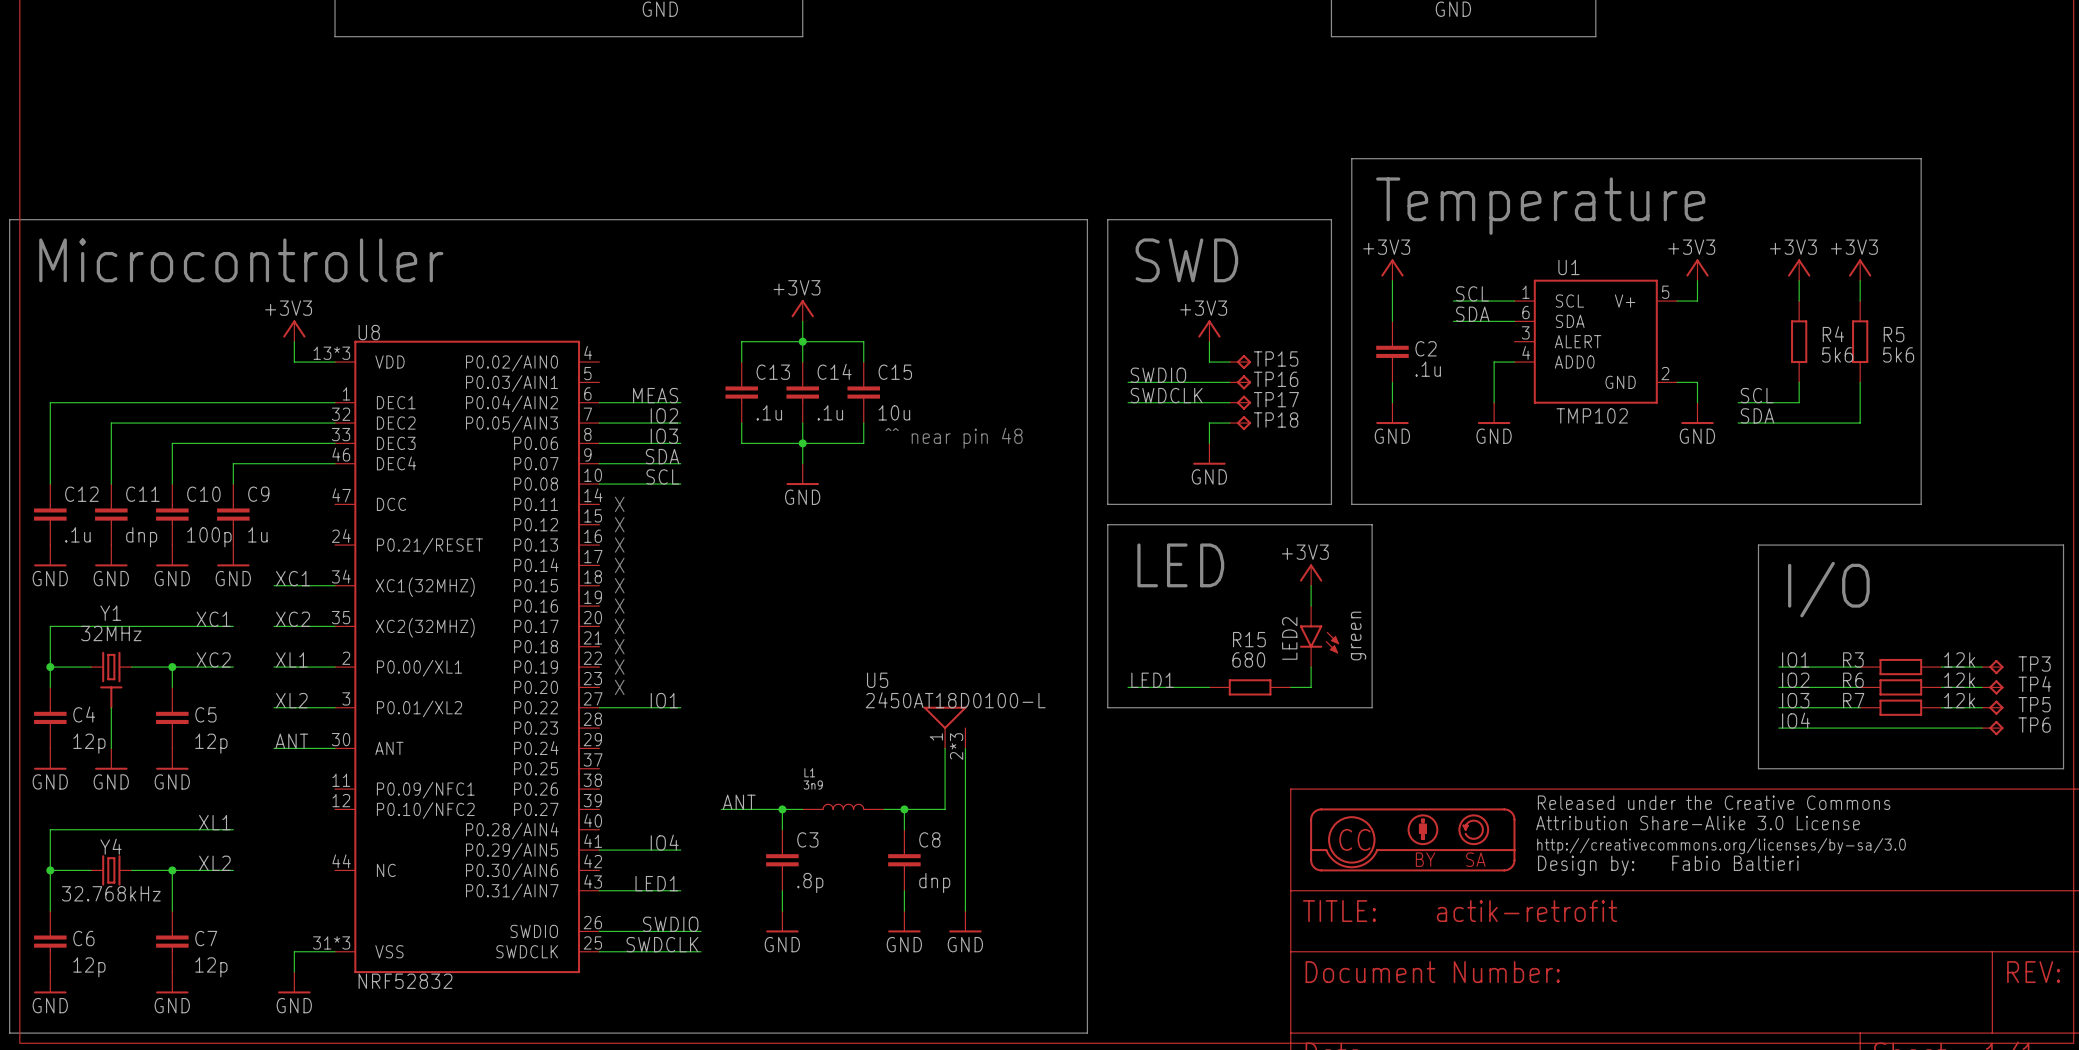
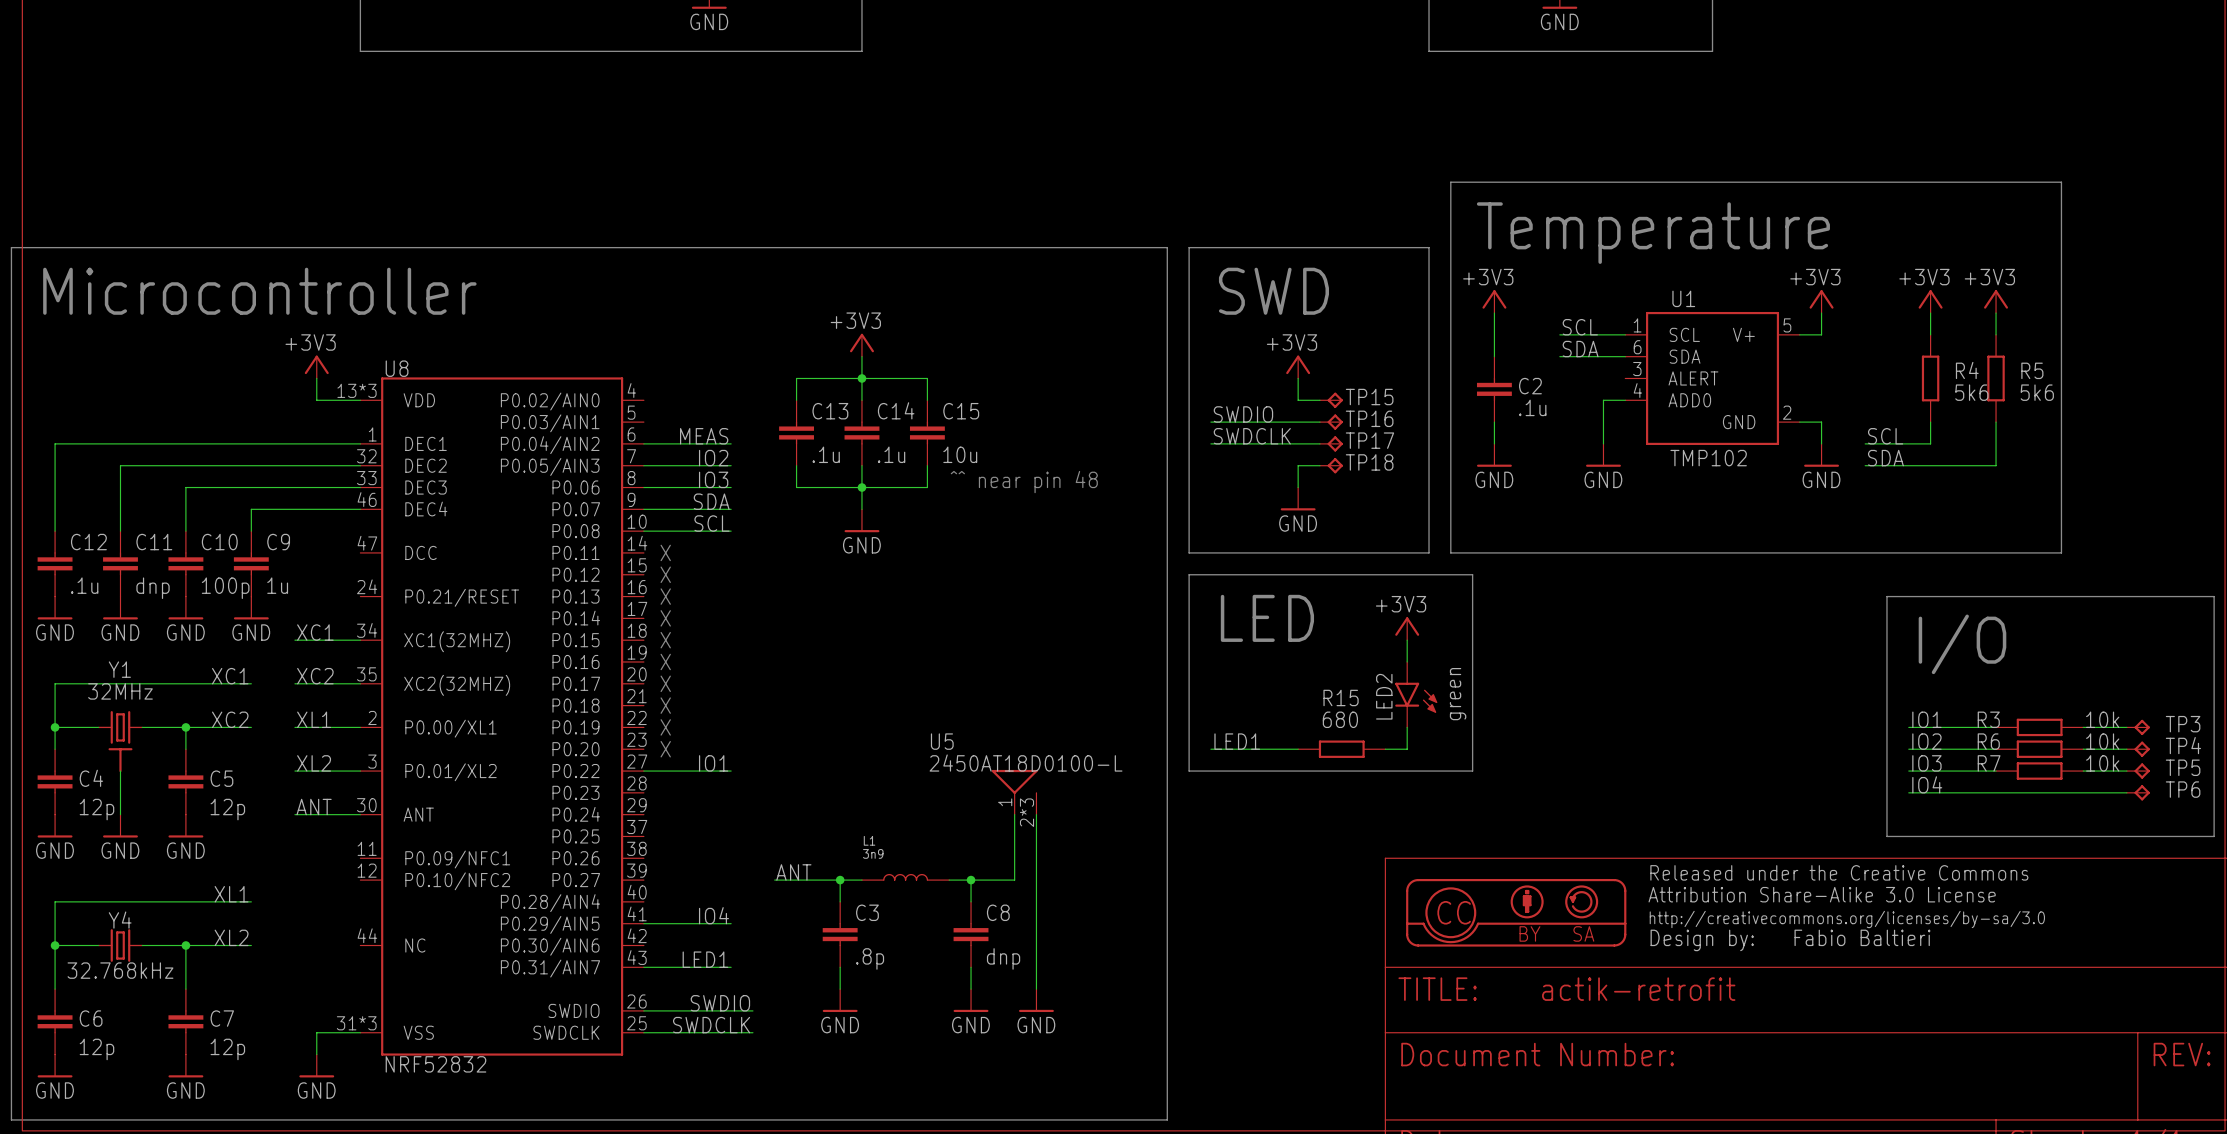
R3 value: 12k (1959, 659) -> 10k (2102, 719)
R6 value: 12k (1959, 680) -> 10k (2102, 741)
R7 value: 12k (1959, 700) -> 10k (2102, 763)

